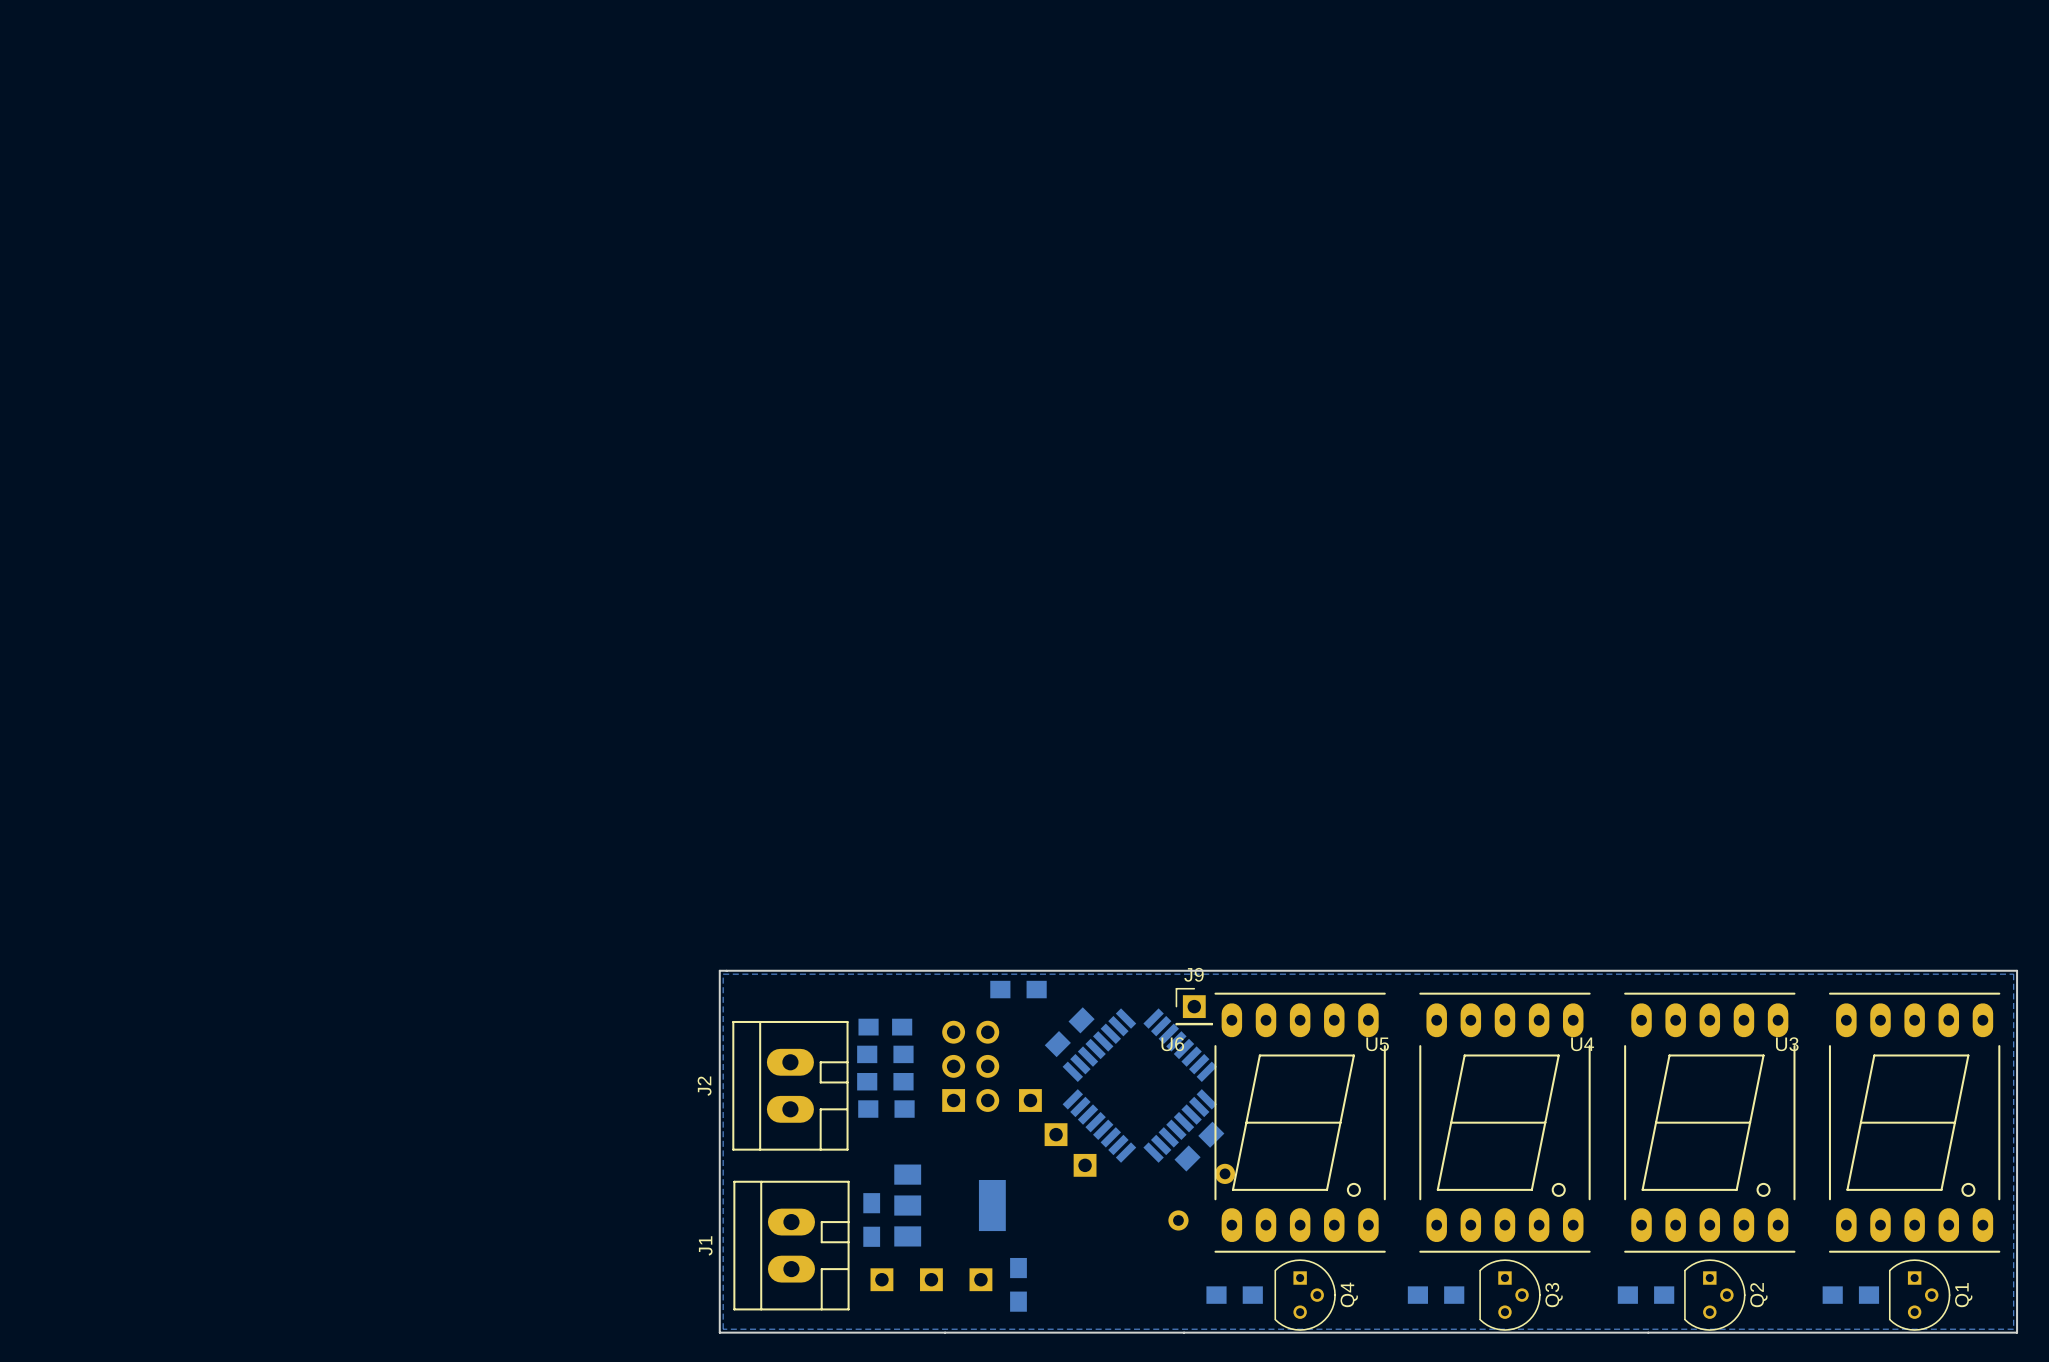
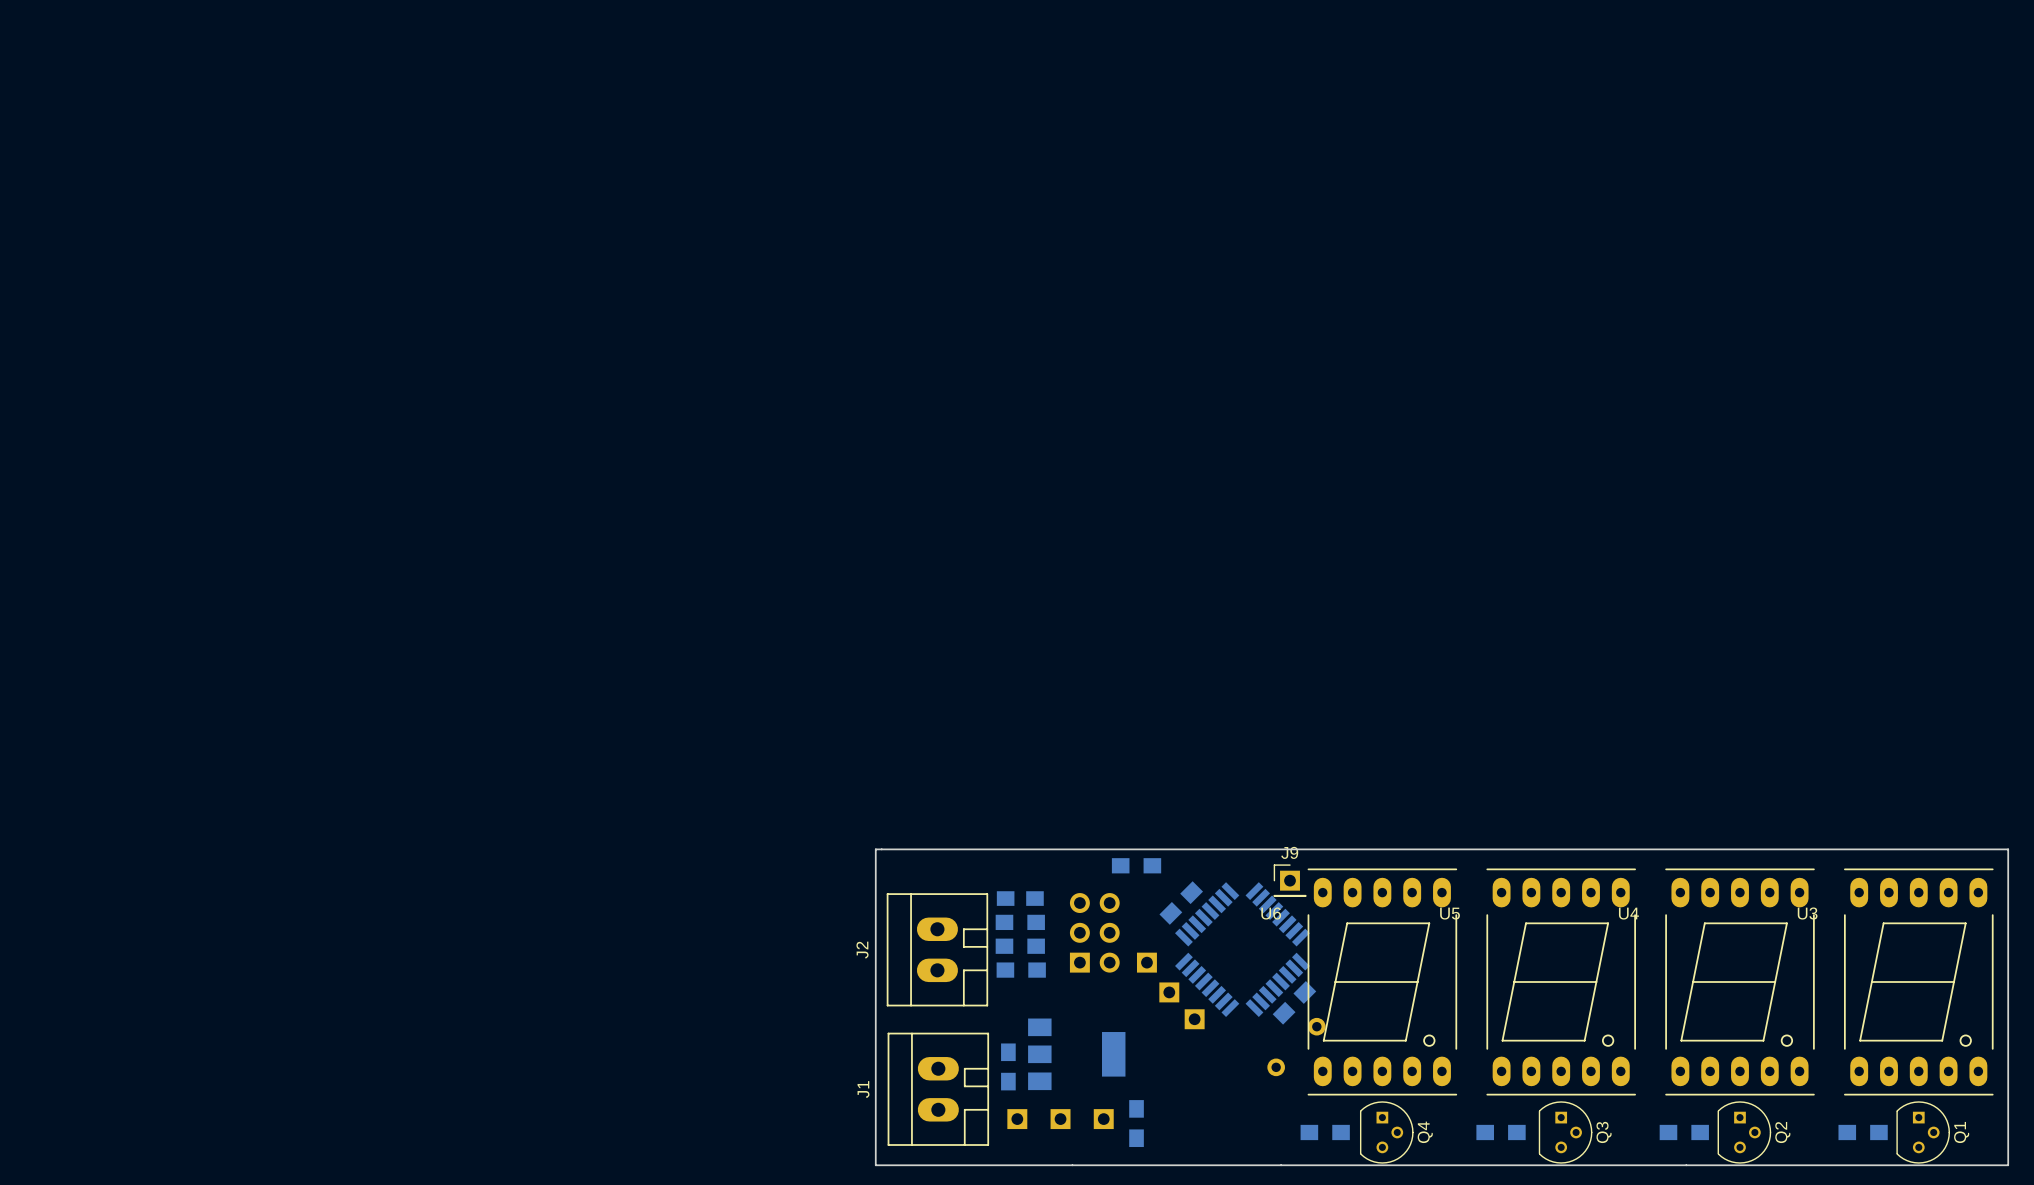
bottom zone outline: (723, 974) (2013, 974) (2013, 1329) (723, 1329) (723, 974) -> none

